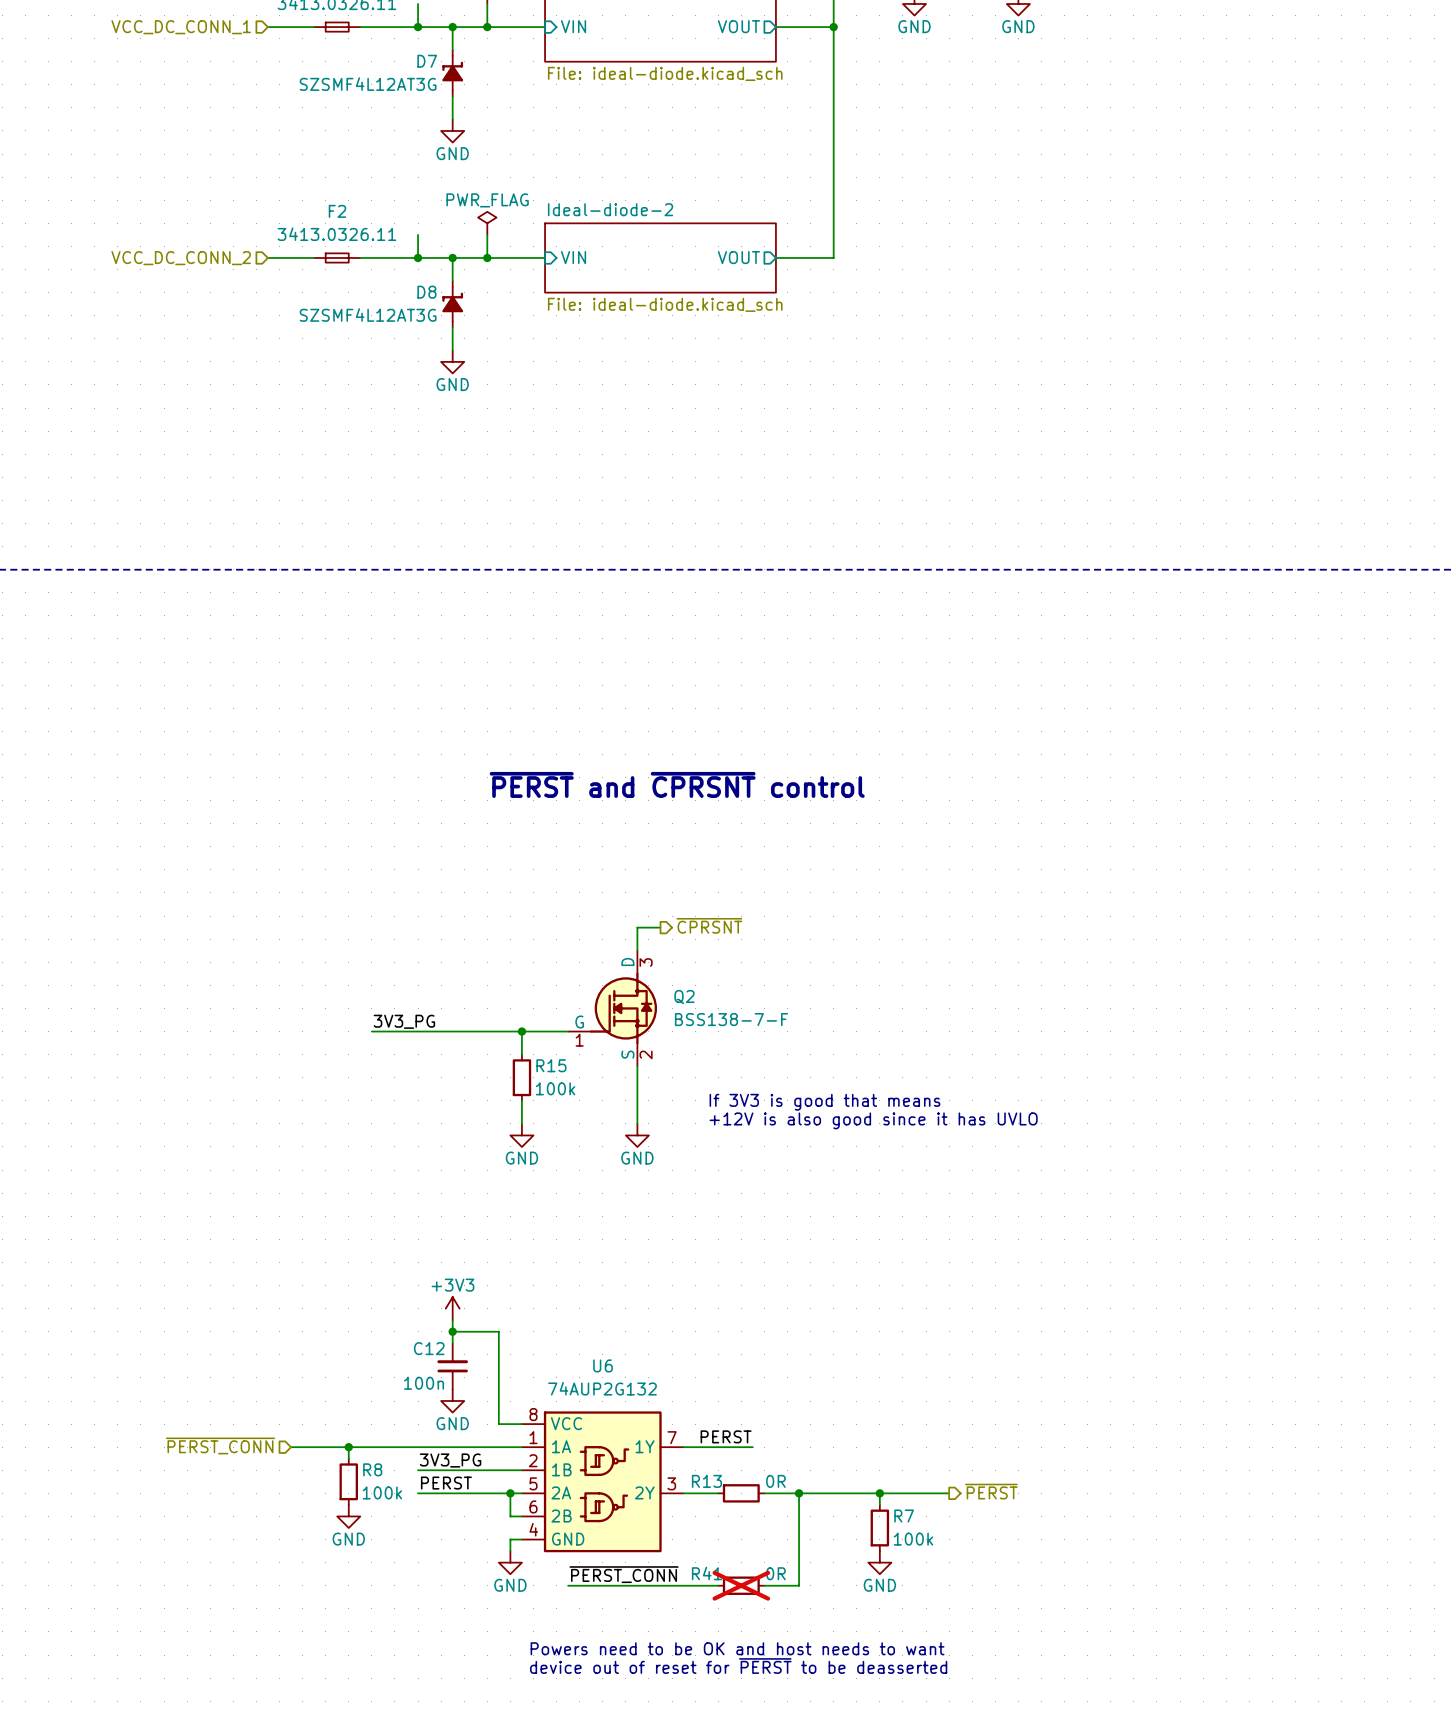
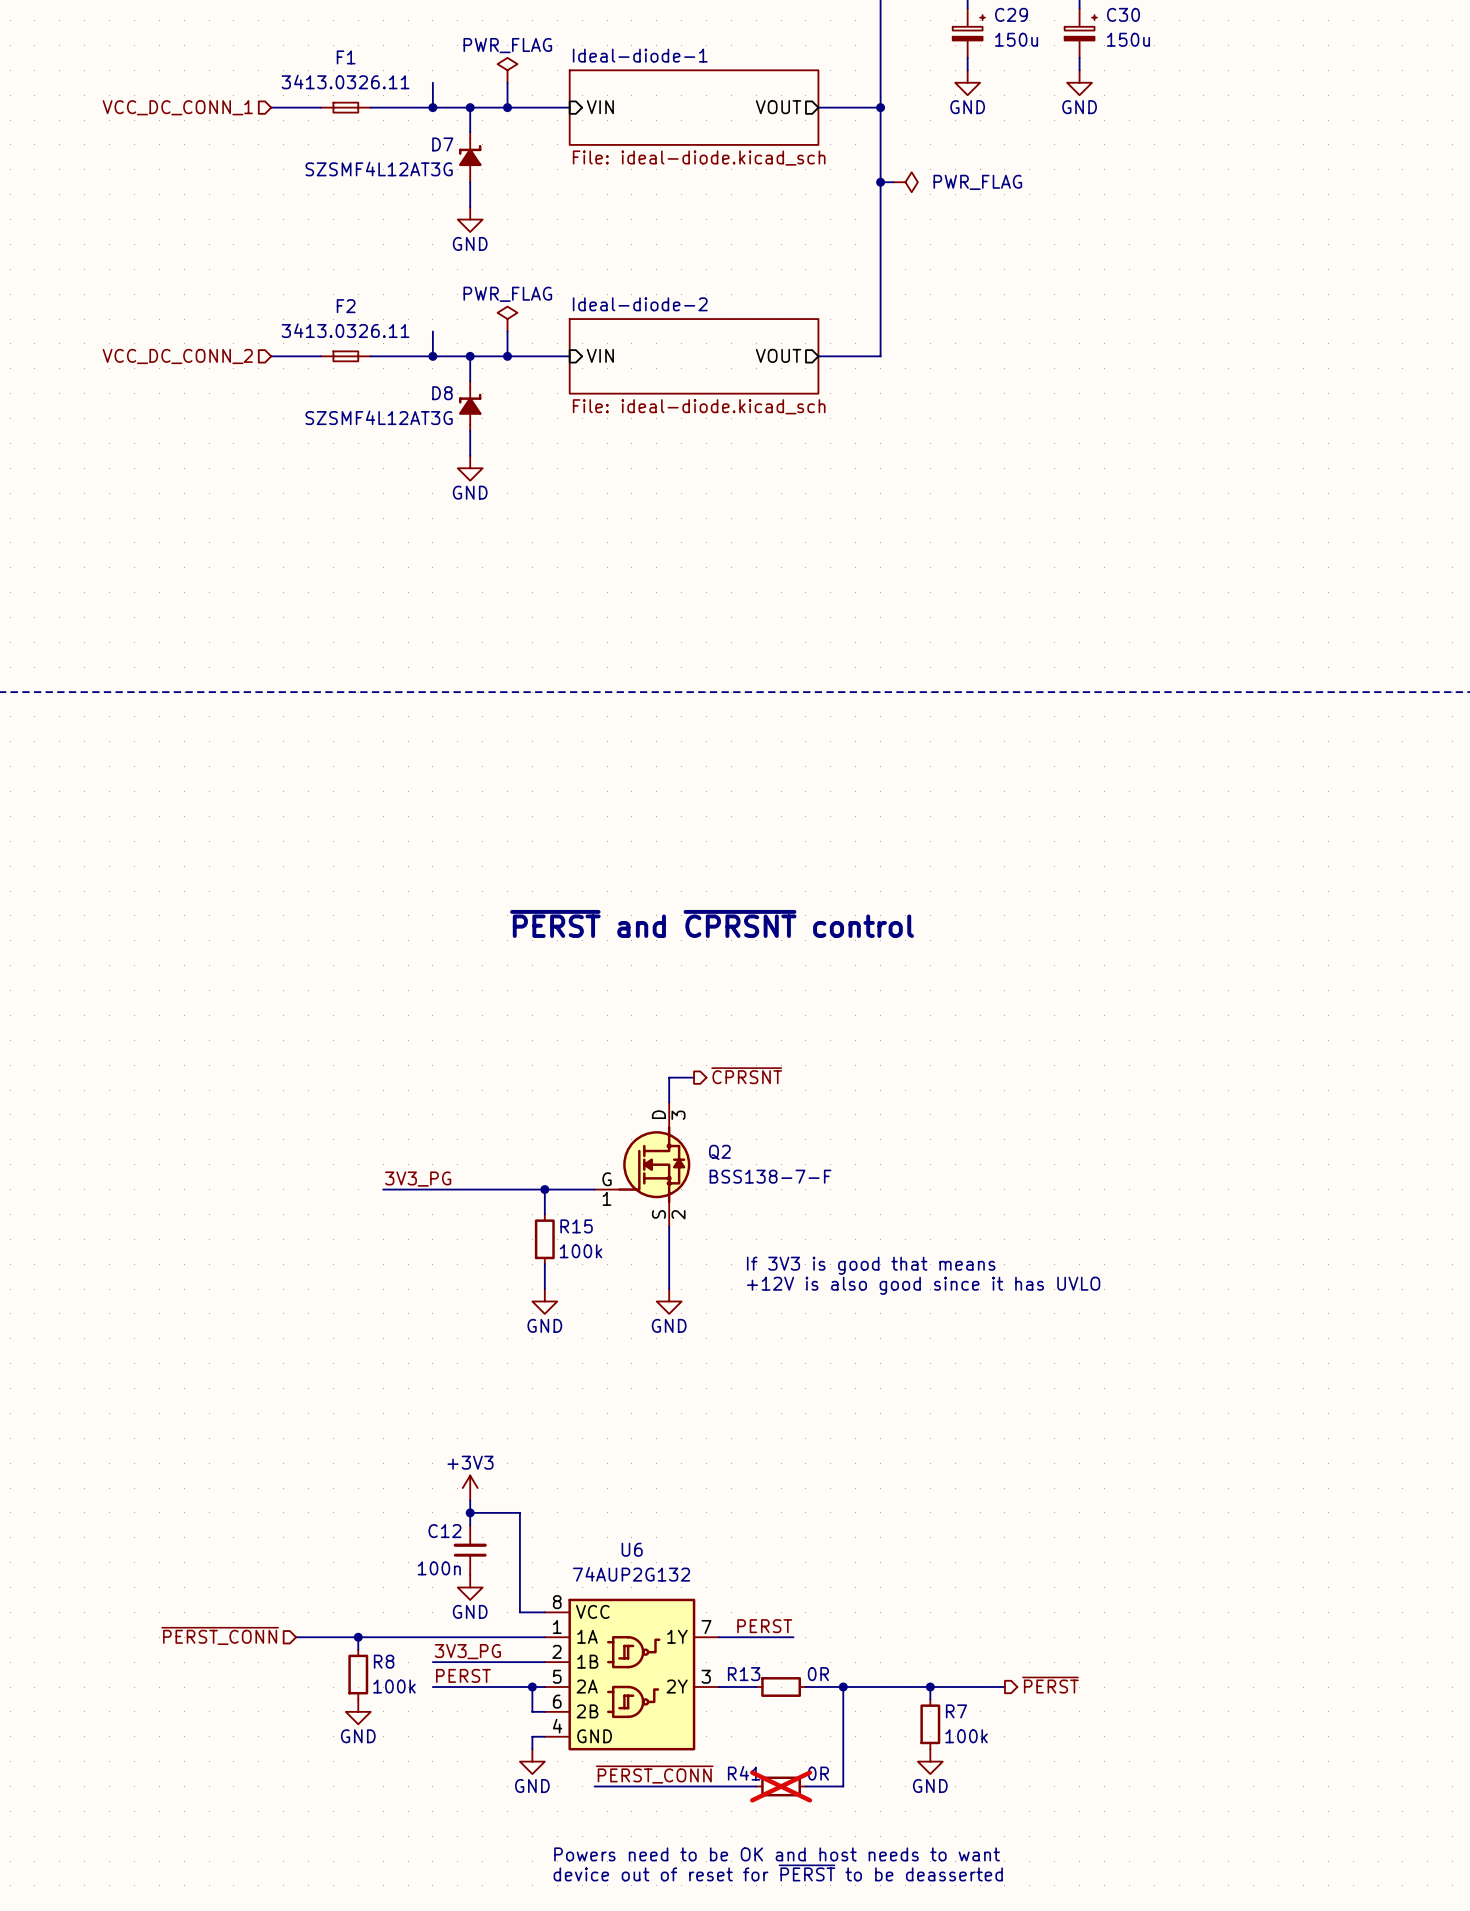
wire: none -> (880, 182) (893, 182)
junction: none -> (880, 182)
power symbol: none -> PWR_FLAG (905, 182)

